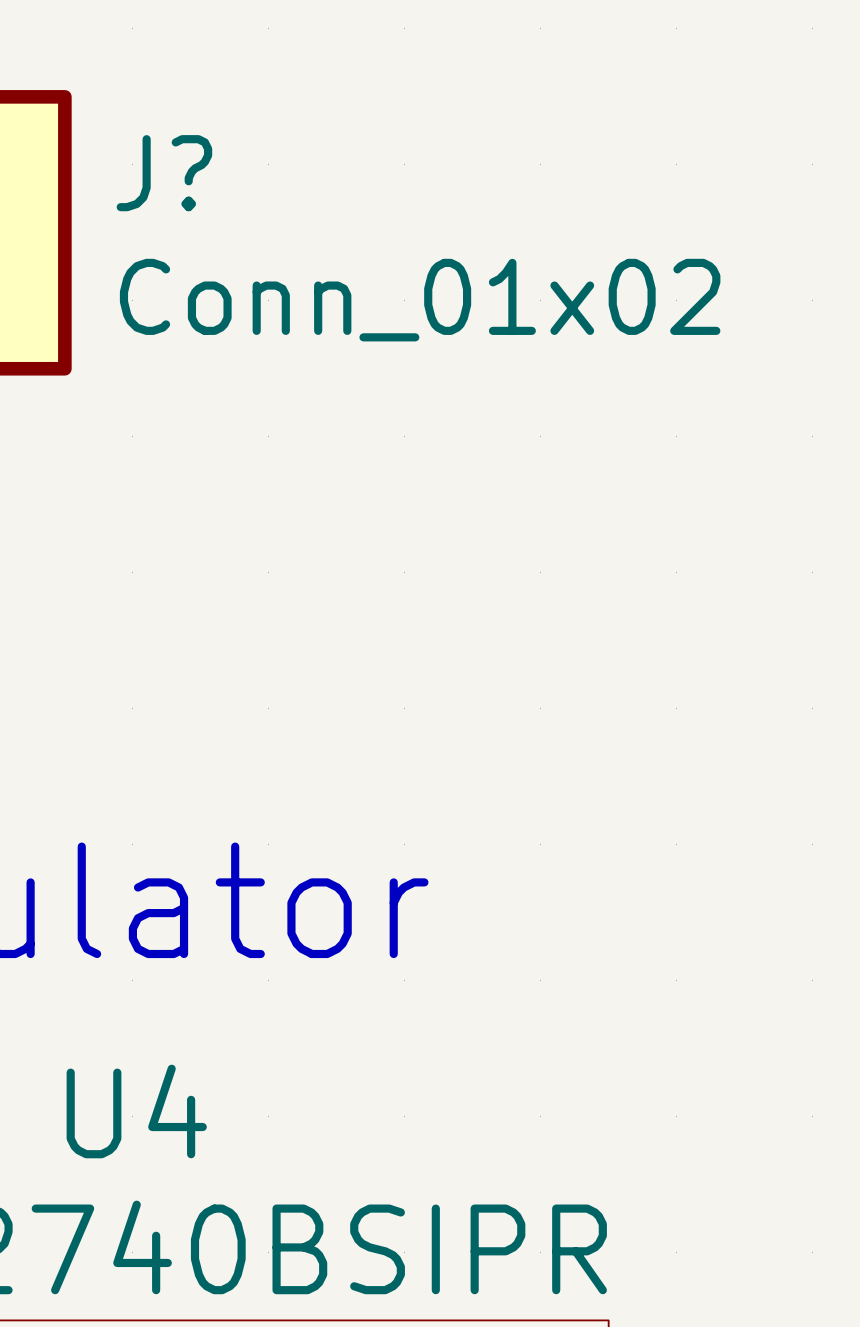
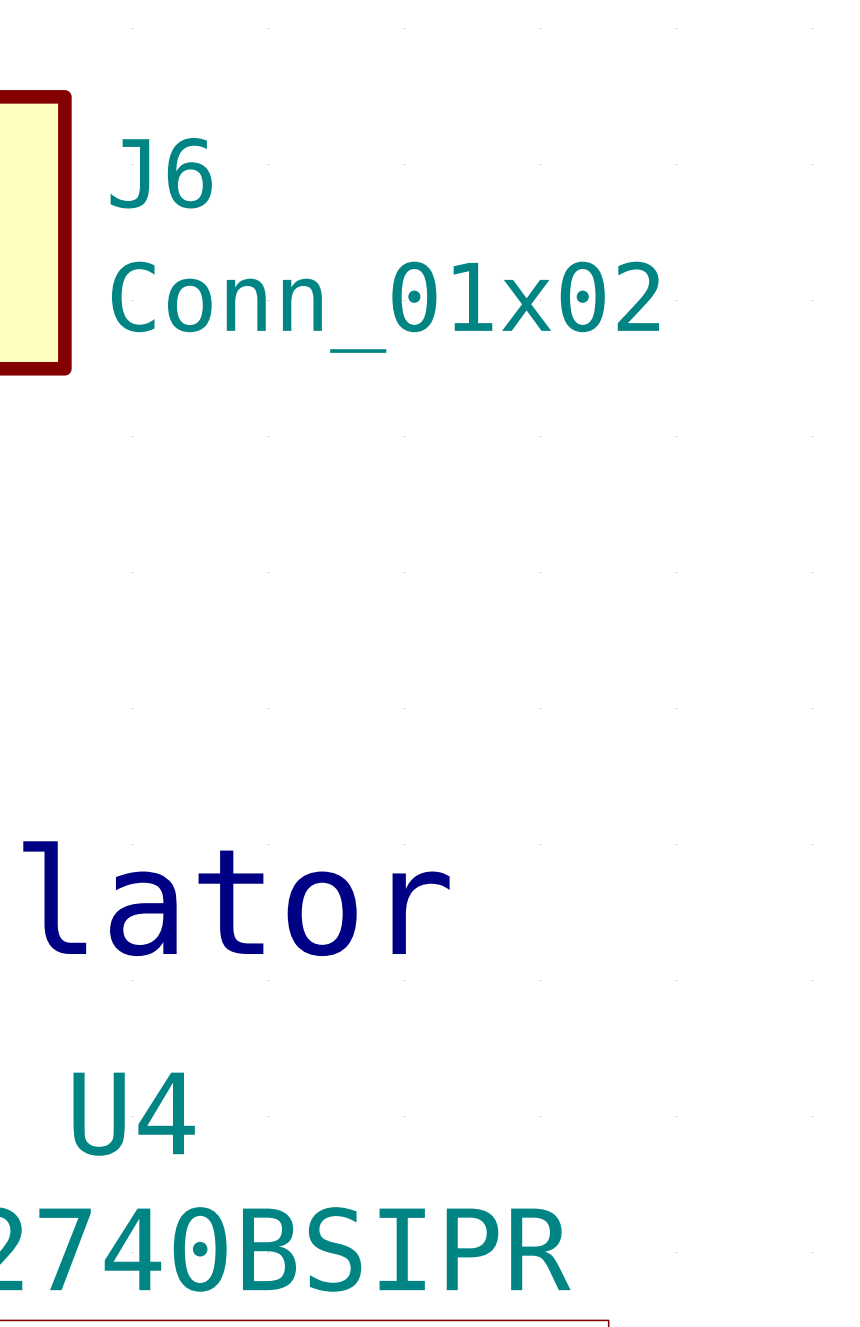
J? name: J? (164, 173) -> J6 (161, 173)

